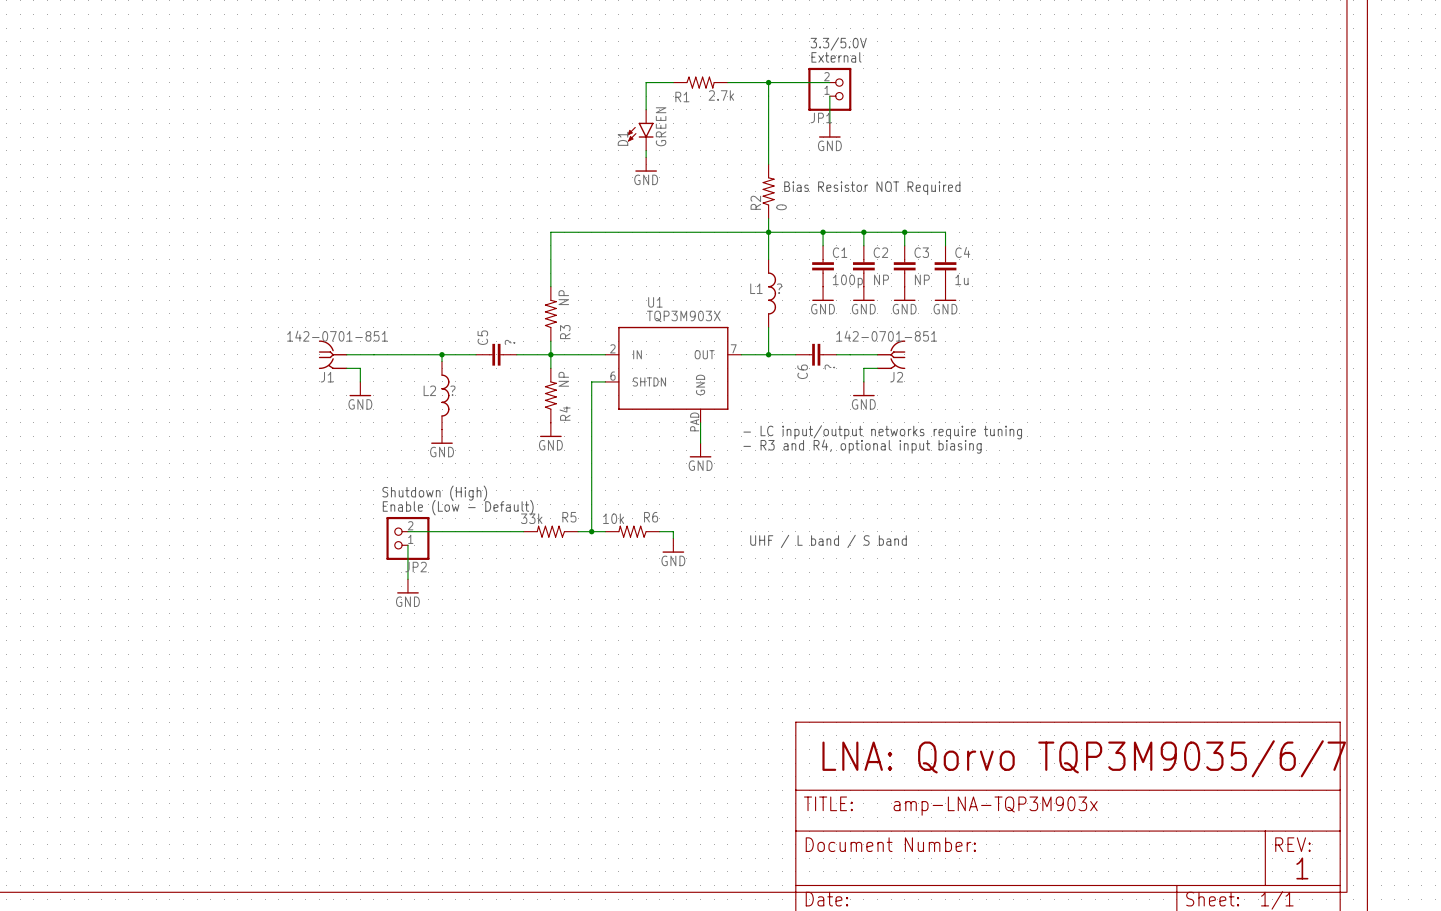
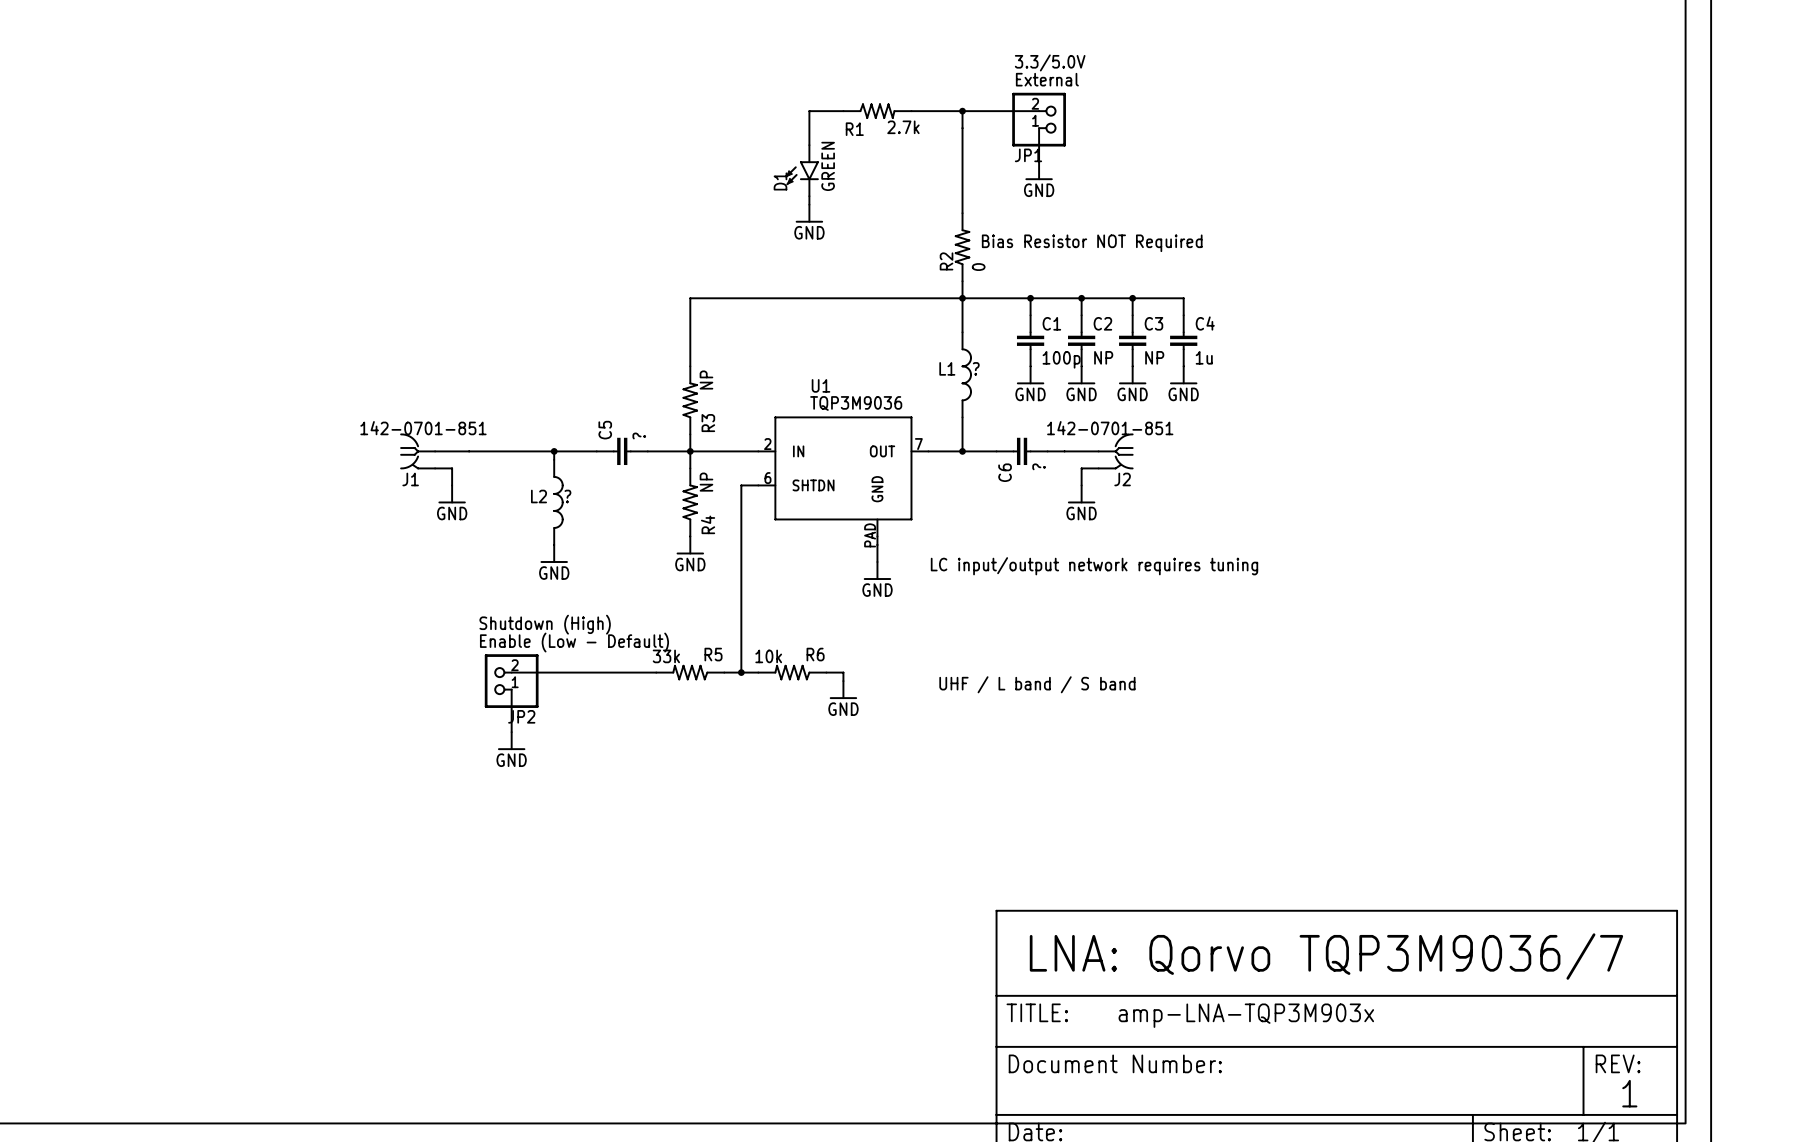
U1 value: TQP3M903X (683, 316) -> TQP3M9036 (856, 403)
text: - LC input/output networks require tuning (882, 432) -> none
text: - R3 and R4, optional input biasing (862, 446) -> LC input/output network requires tuning (1094, 566)
text: LNA: Qorvo TQP3M9035/6/7 (1084, 758) -> LNA: Qorvo TQP3M9036/7 (1326, 956)

